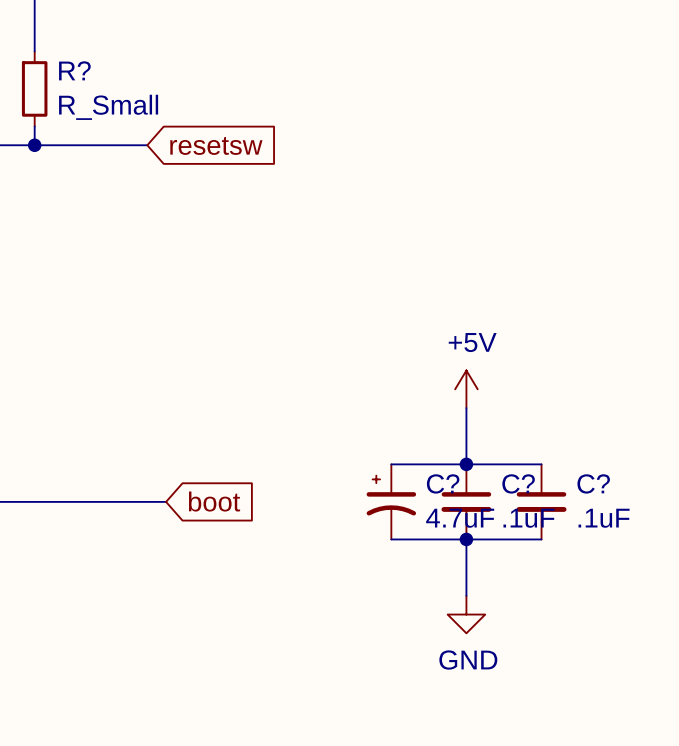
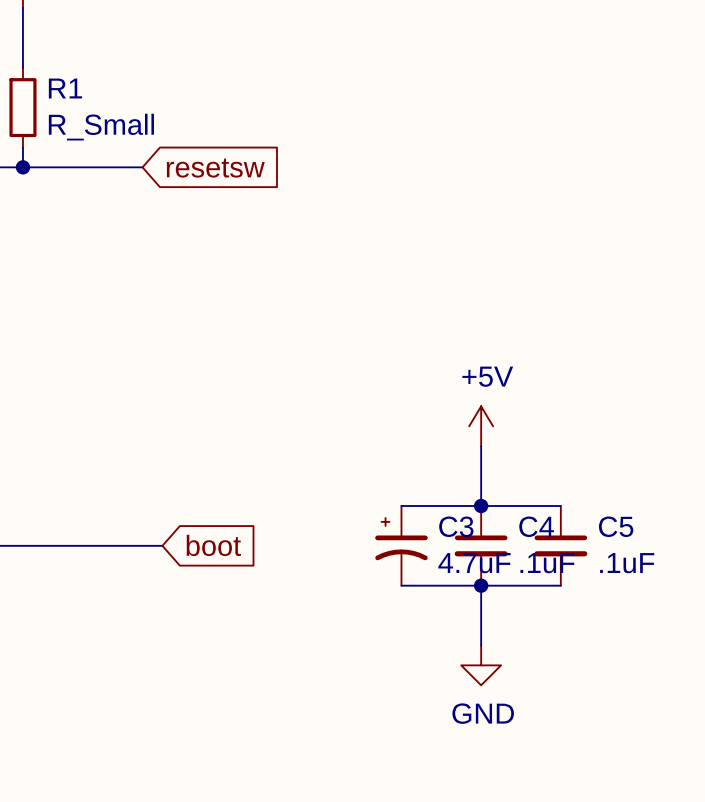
R? name: R? (74, 70) -> R1 (65, 88)
C? name: C? (443, 483) -> C3 (456, 526)
C? name: C? (518, 483) -> C4 (536, 526)
C? name: C? (593, 483) -> C5 (616, 526)

